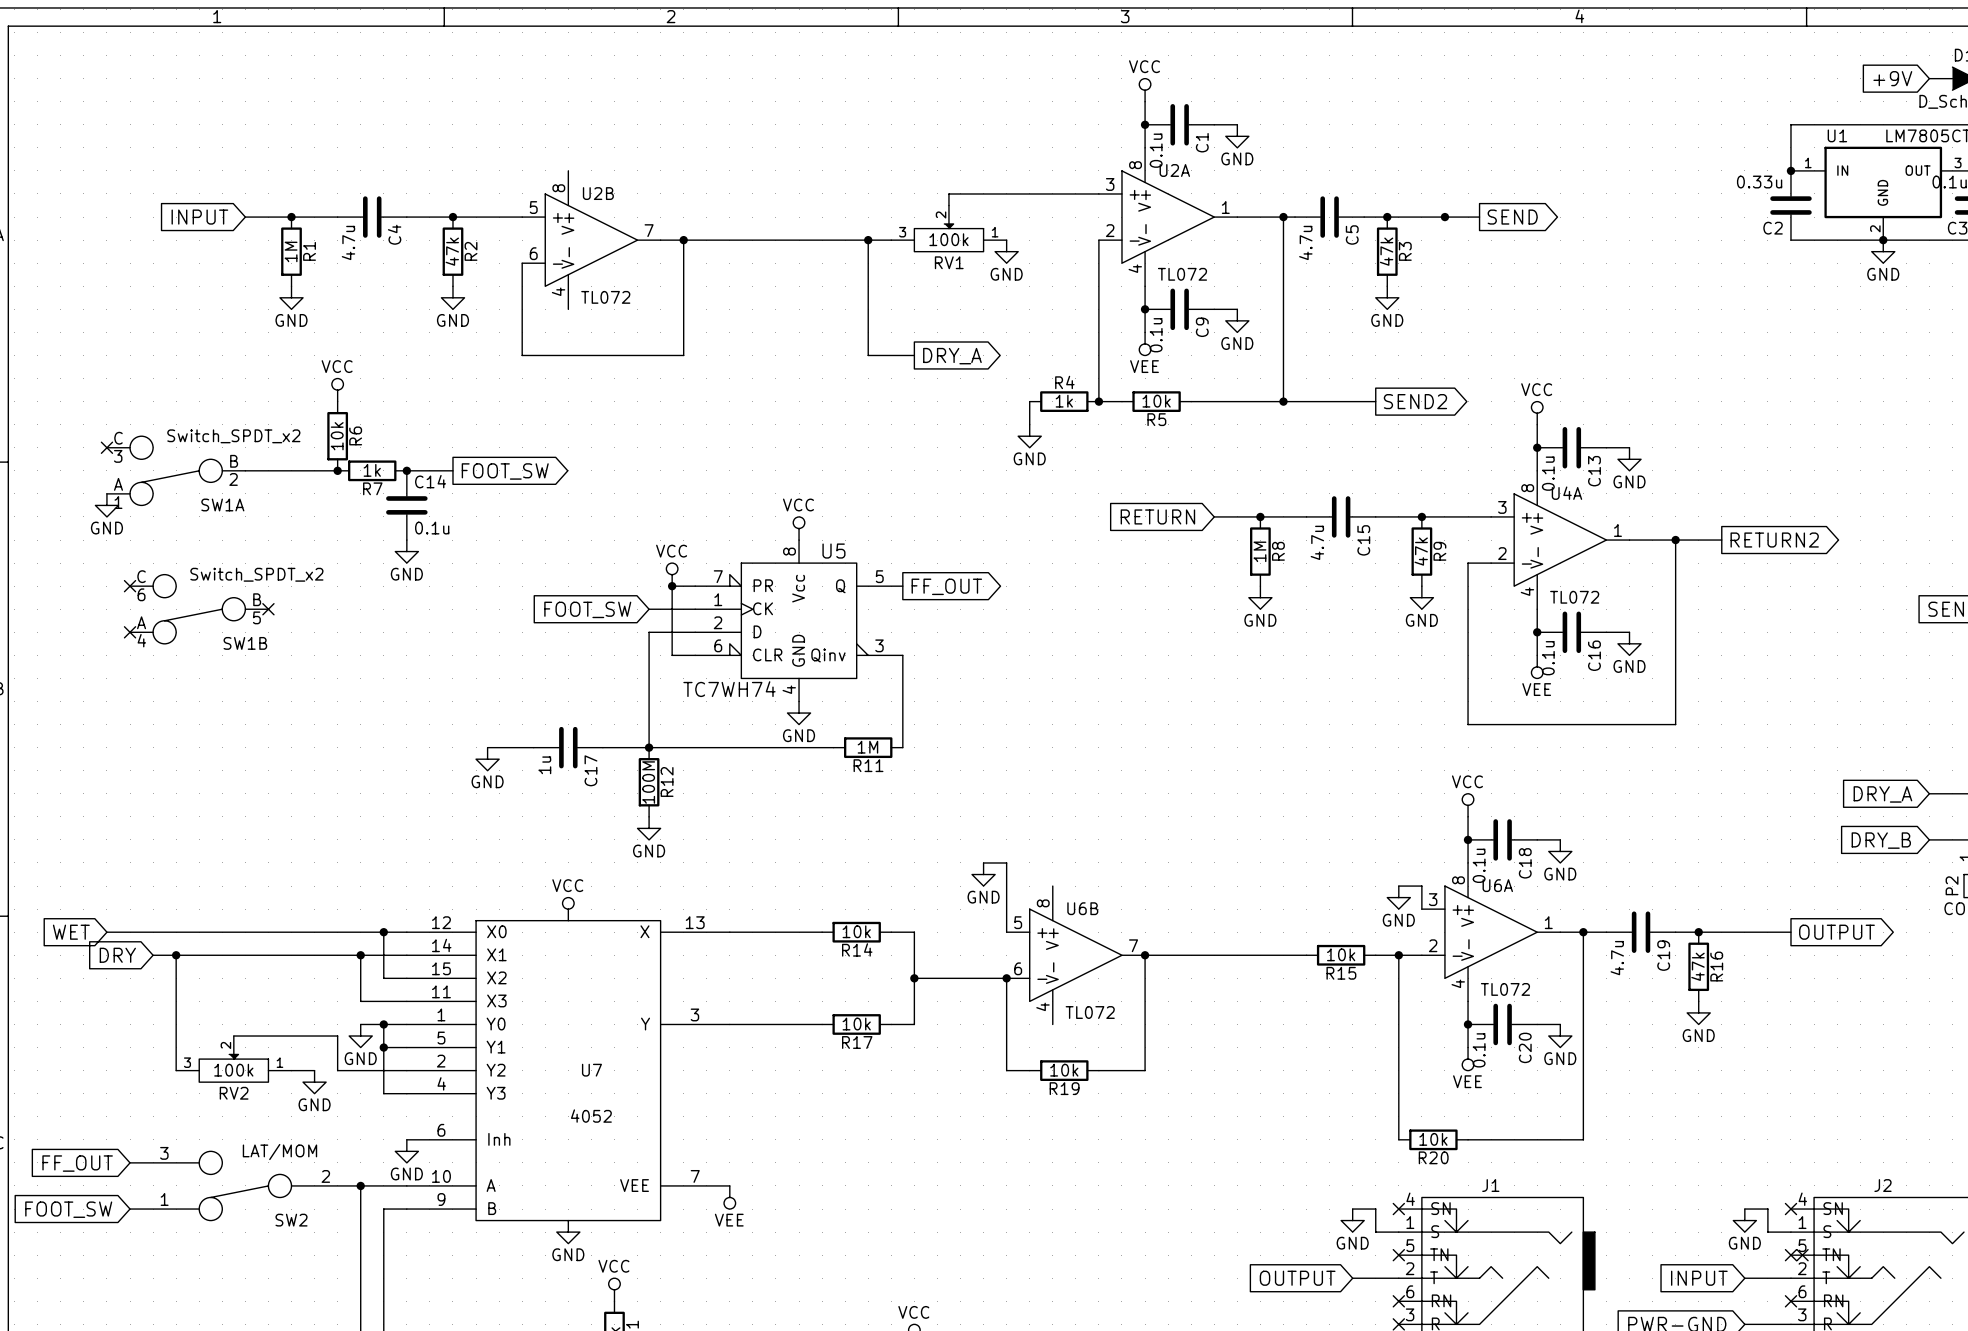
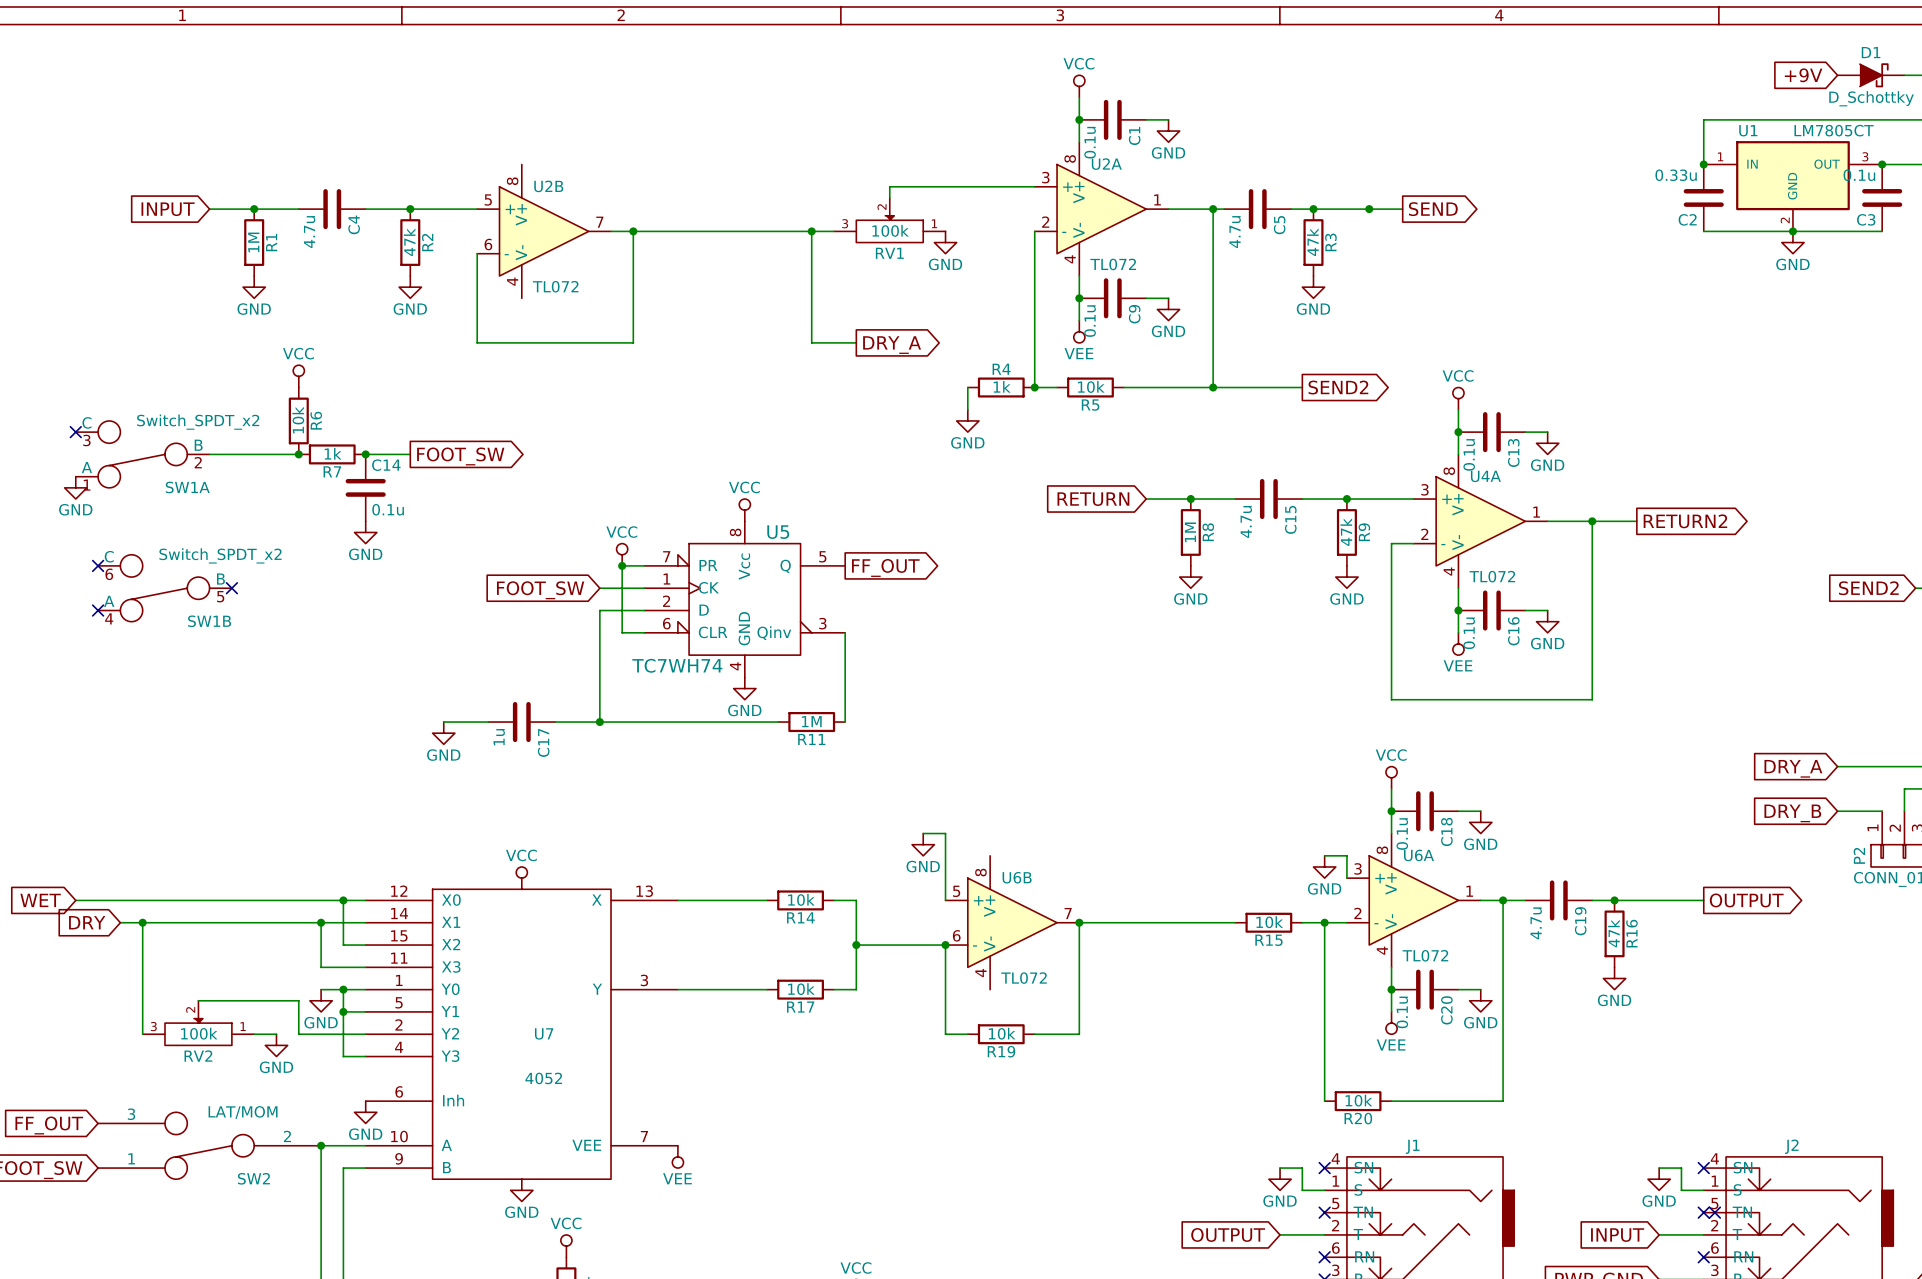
R12: 100M (649, 782) -> none
power symbol: GND (649, 828) -> none

